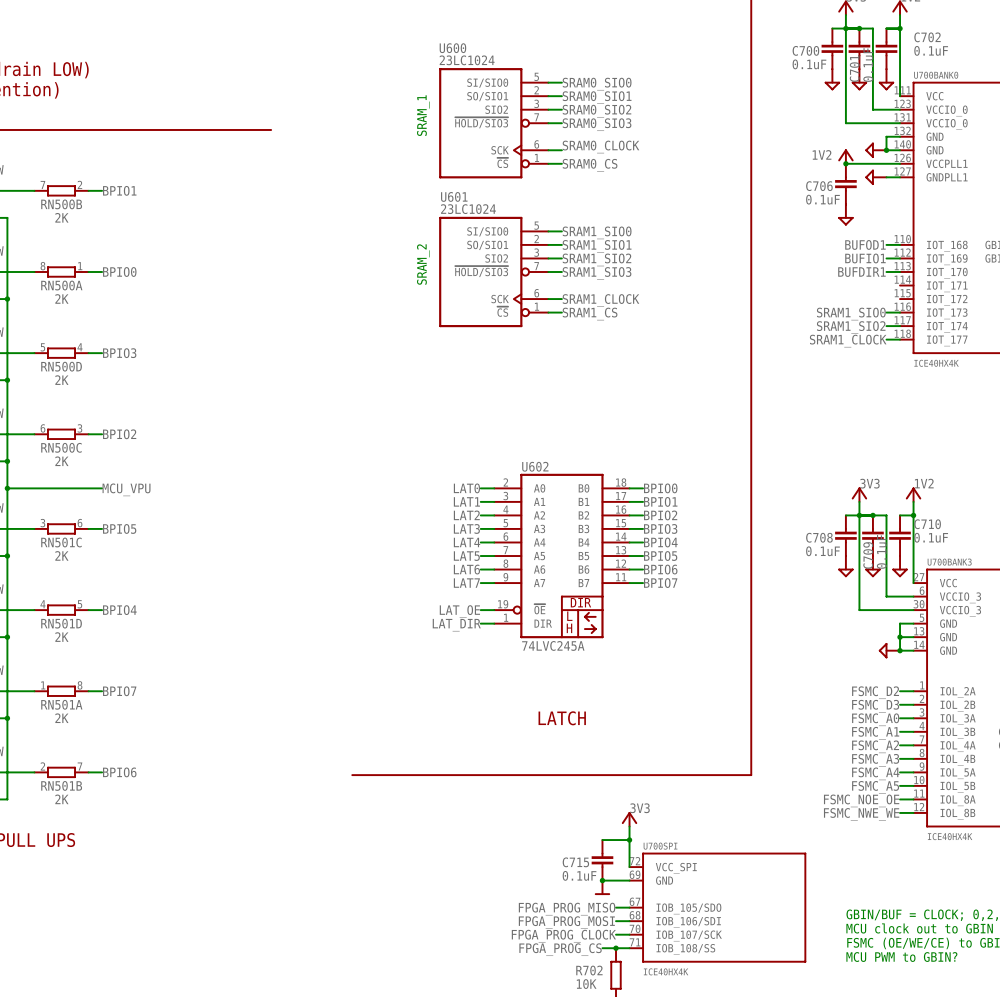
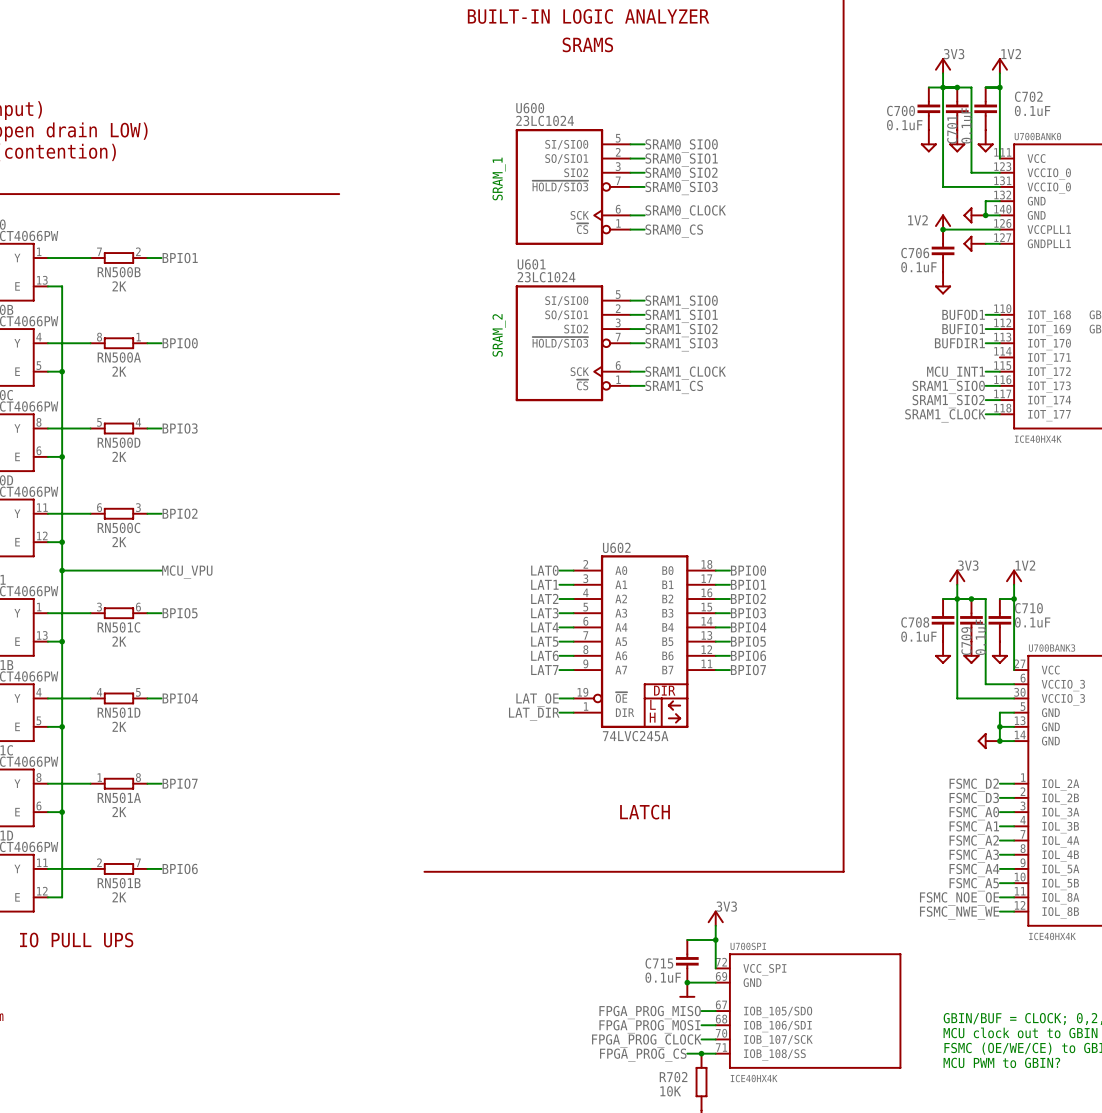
wire: none -> (985, 371) (999, 371)
label: none -> MCU_INT1 (955, 373)

